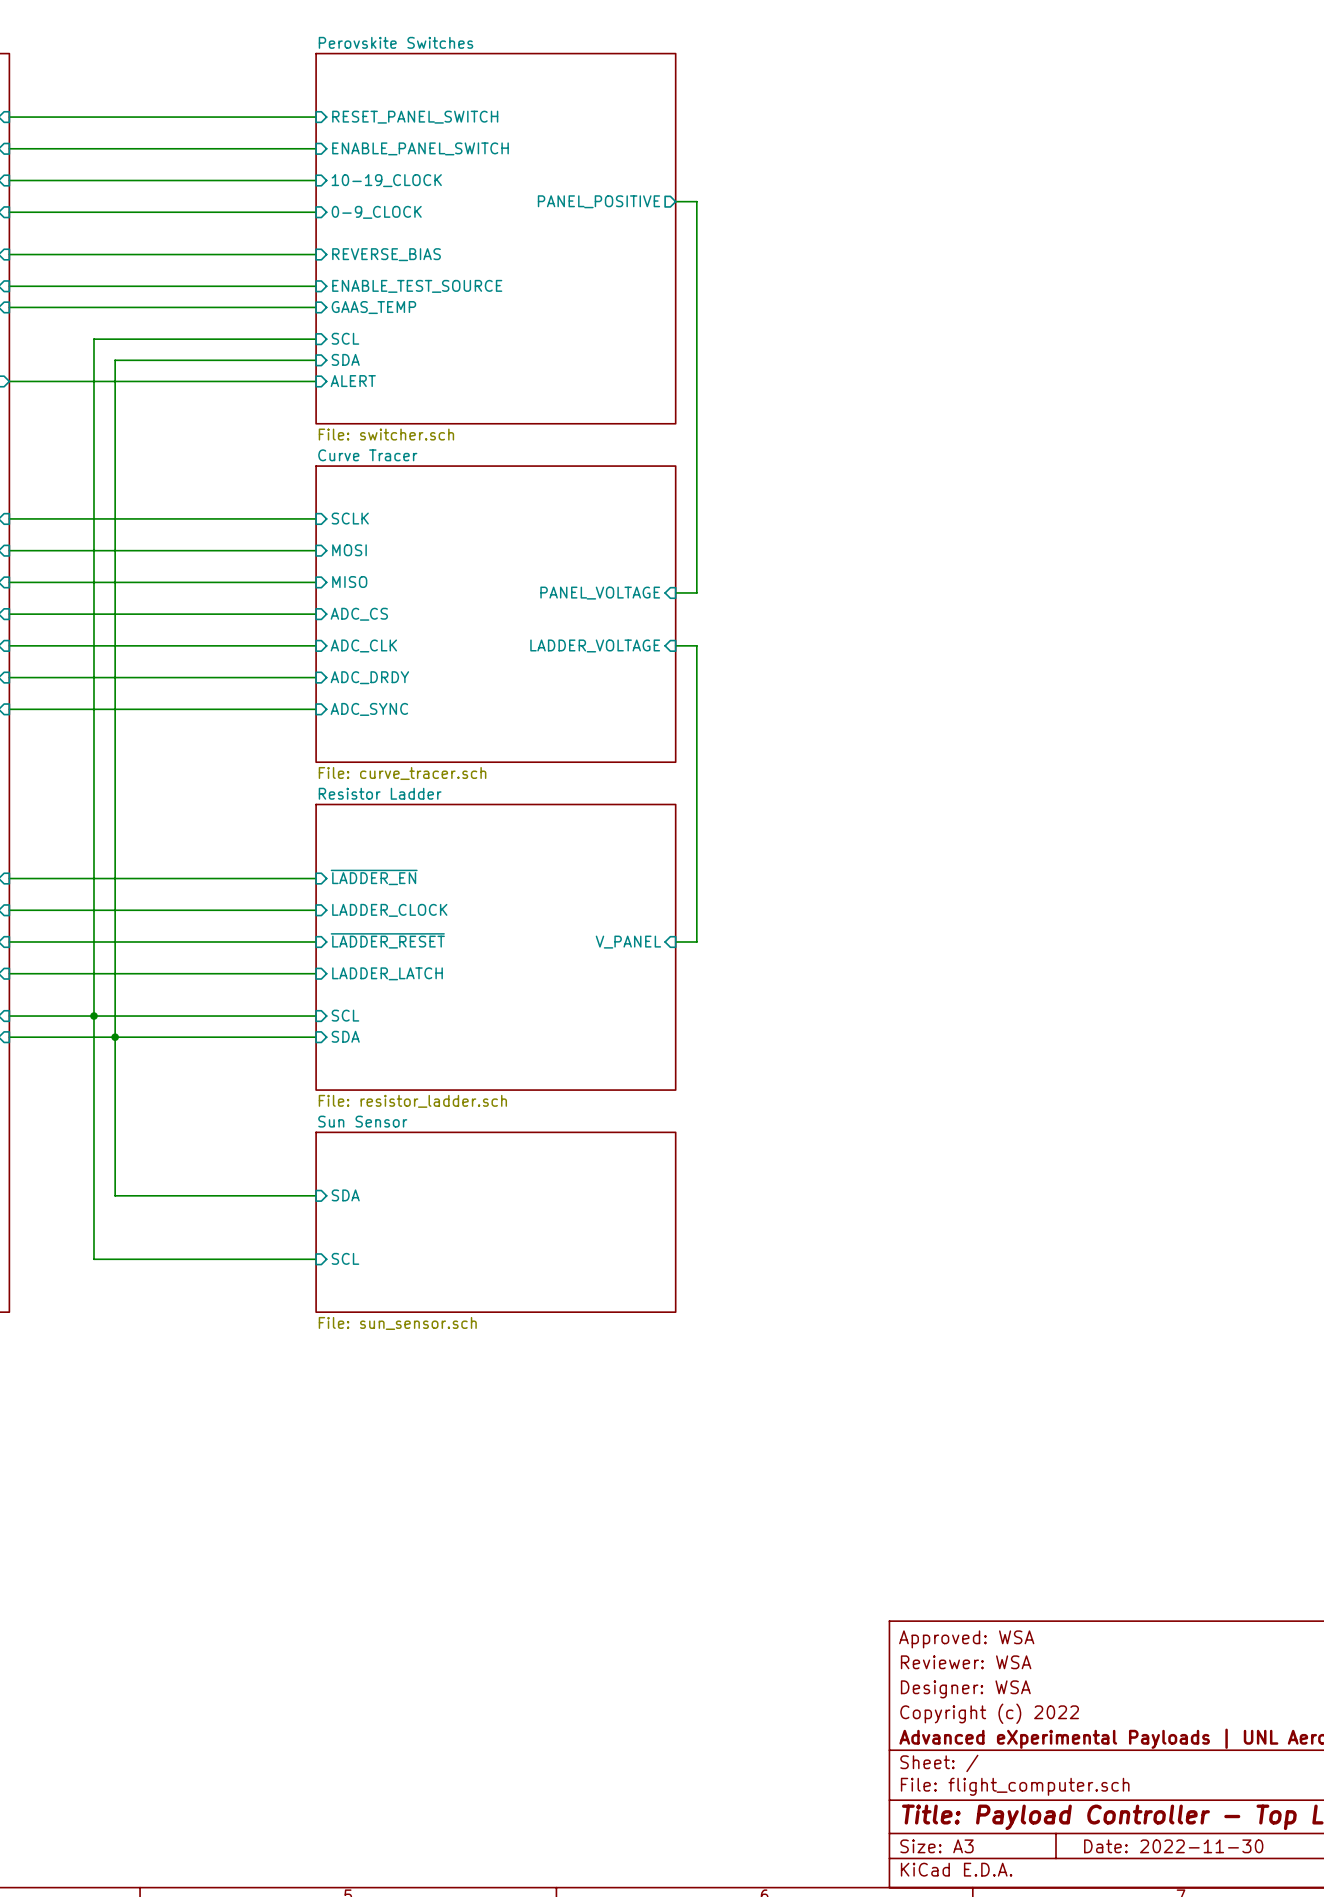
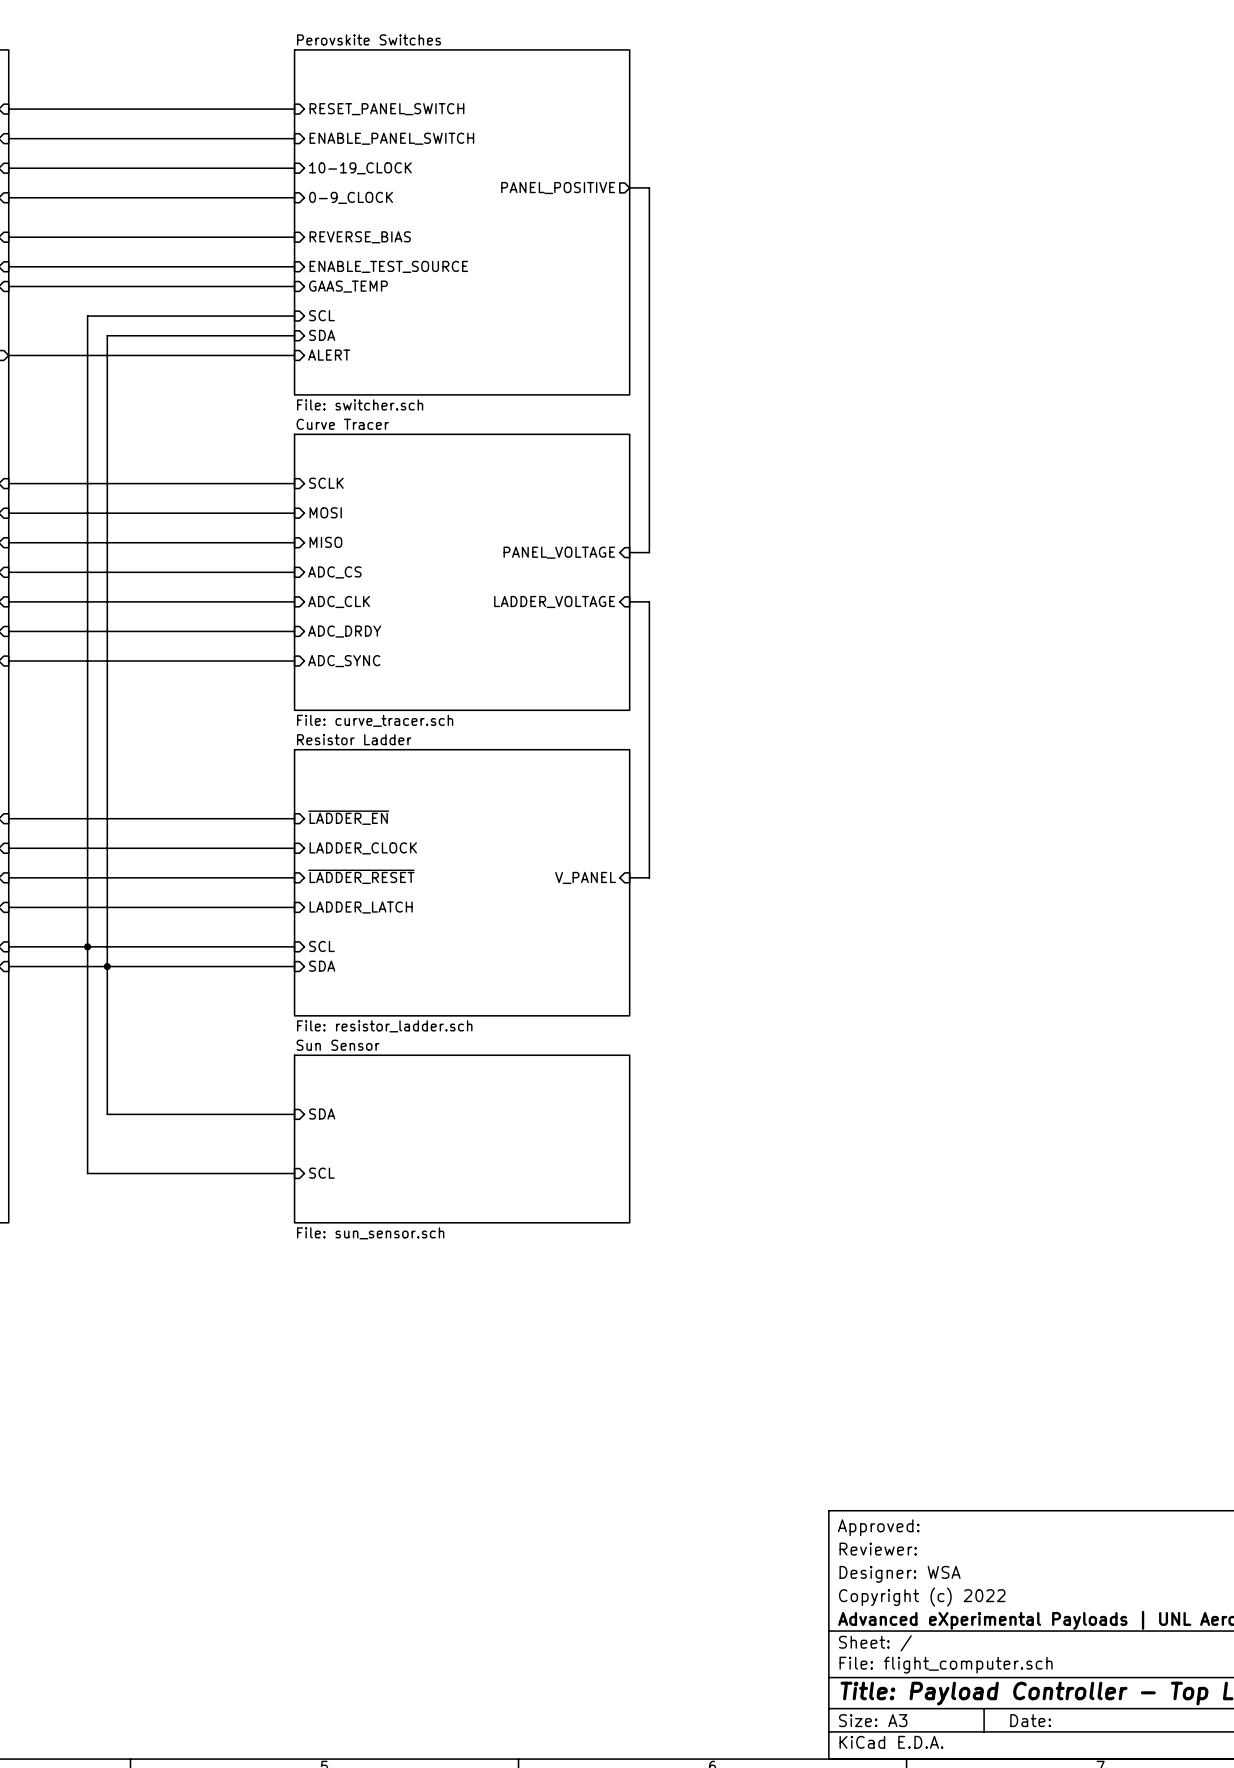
title block: Approved: WSA (966, 1639) -> Approved: (878, 1527)
title block: Reviewer: WSA (966, 1662) -> Reviewer: (878, 1549)
title block: Date: 2022-11-30 (1173, 1846) -> Date: (1030, 1720)

